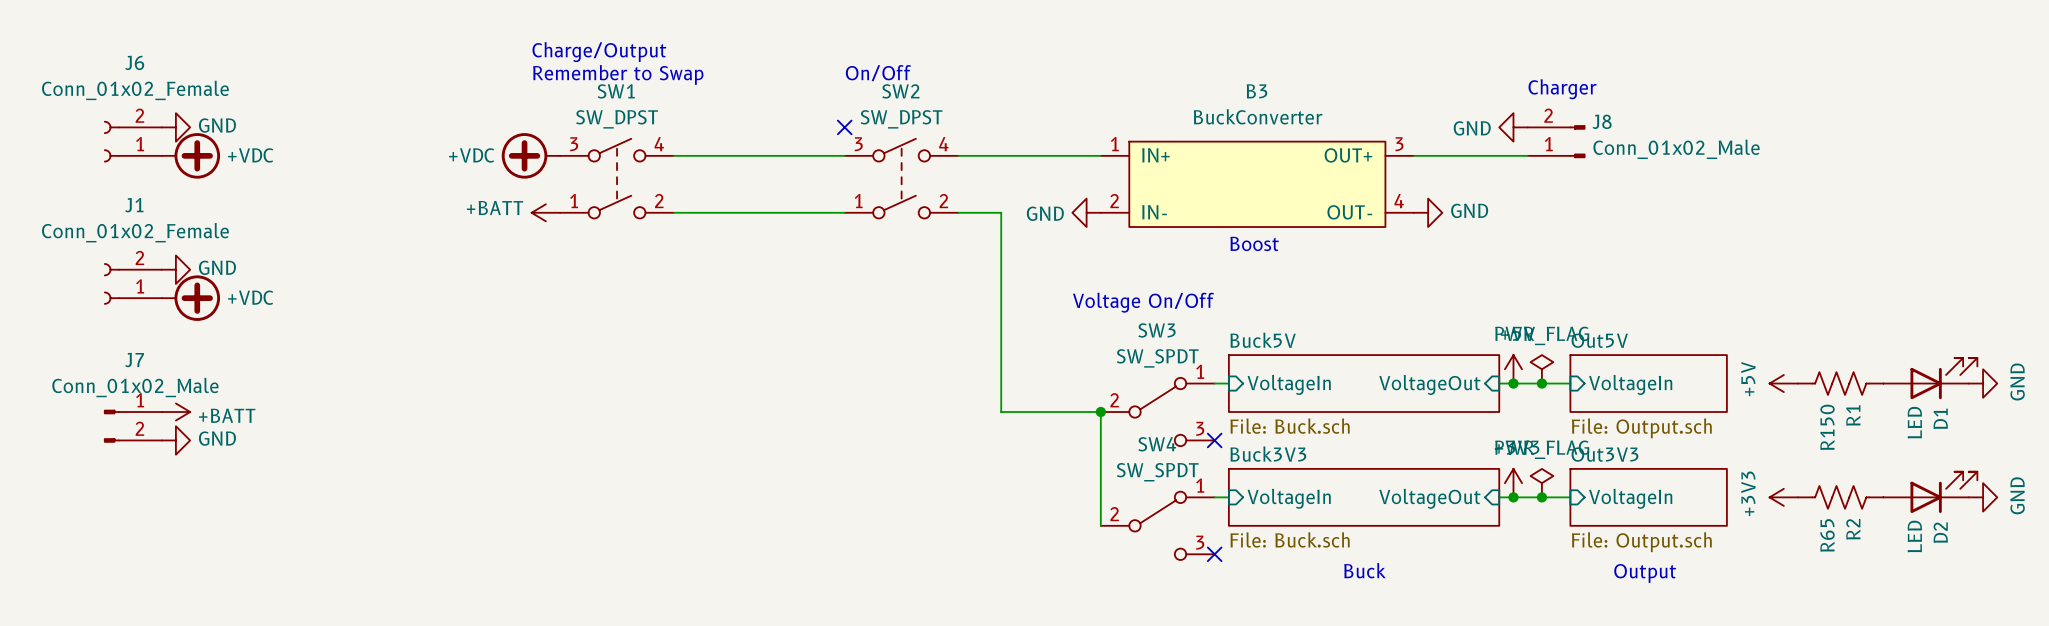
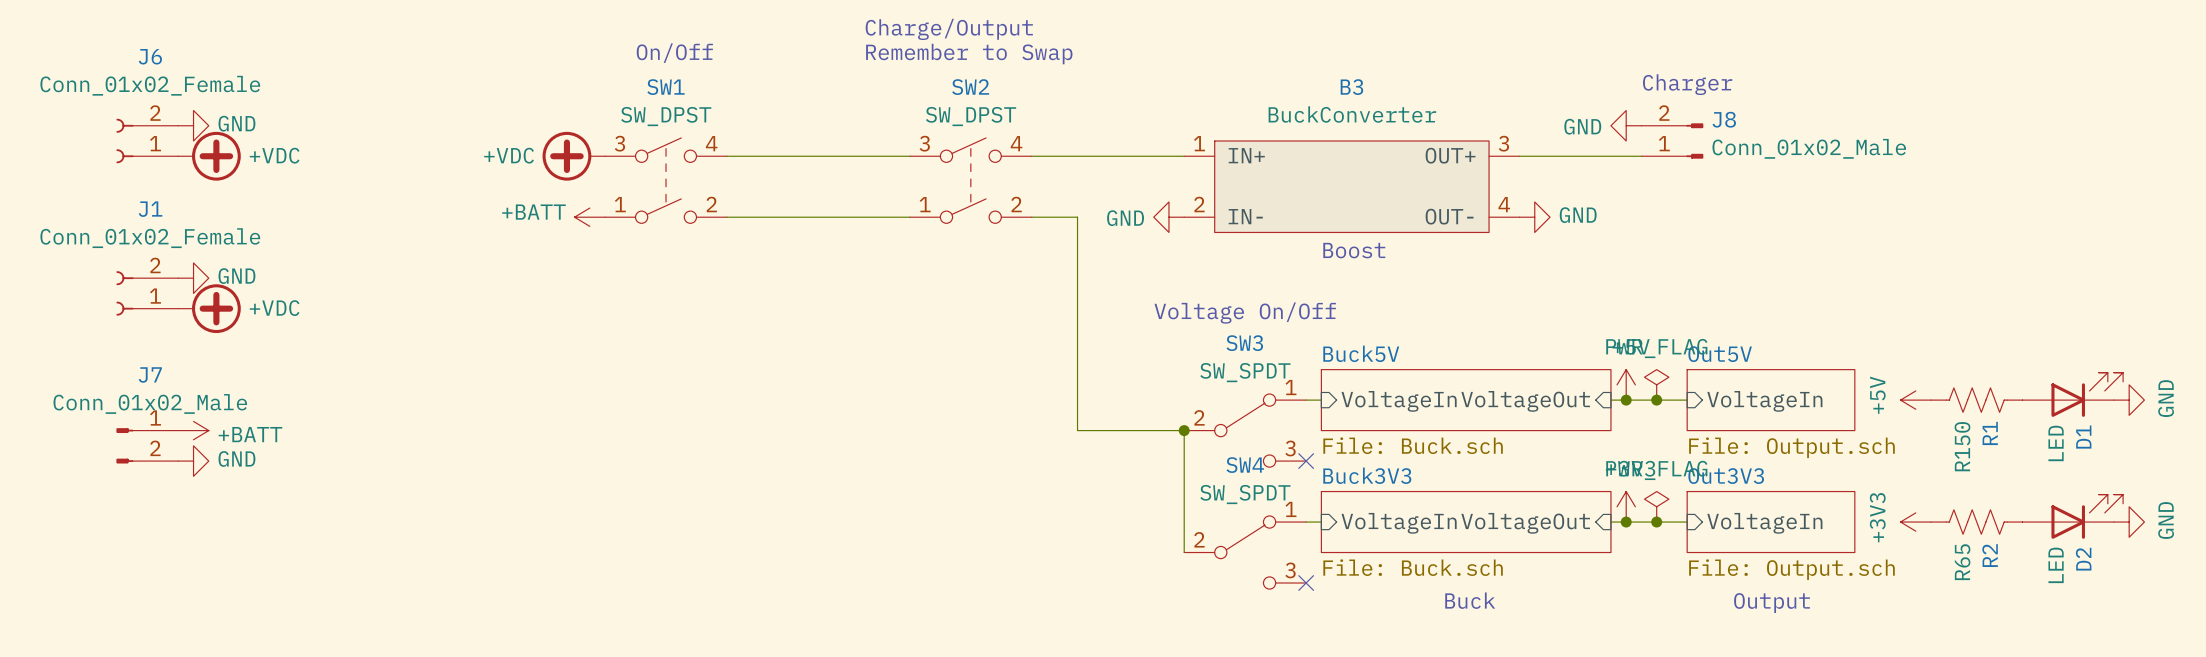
text position: Charge/Output (599, 52) -> Charge/Output (949, 29)
text position: On/Off (878, 73) -> On/Off (674, 53)
text position: Remember to Swap (618, 74) -> Remember to Swap (969, 54)
no-connect mark: (844, 127) -> none

